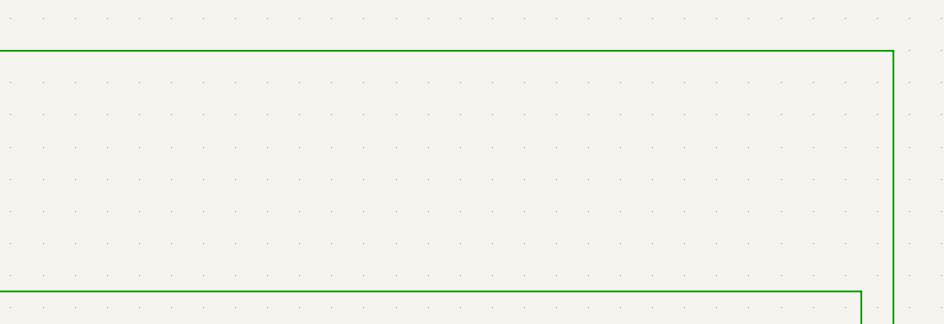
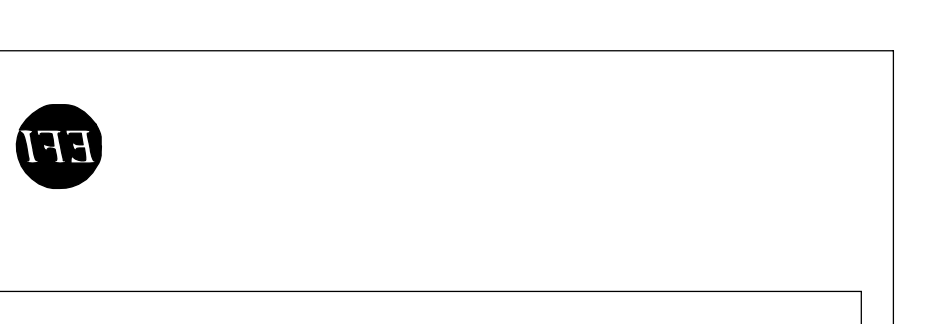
part: none -> (58, 146)

